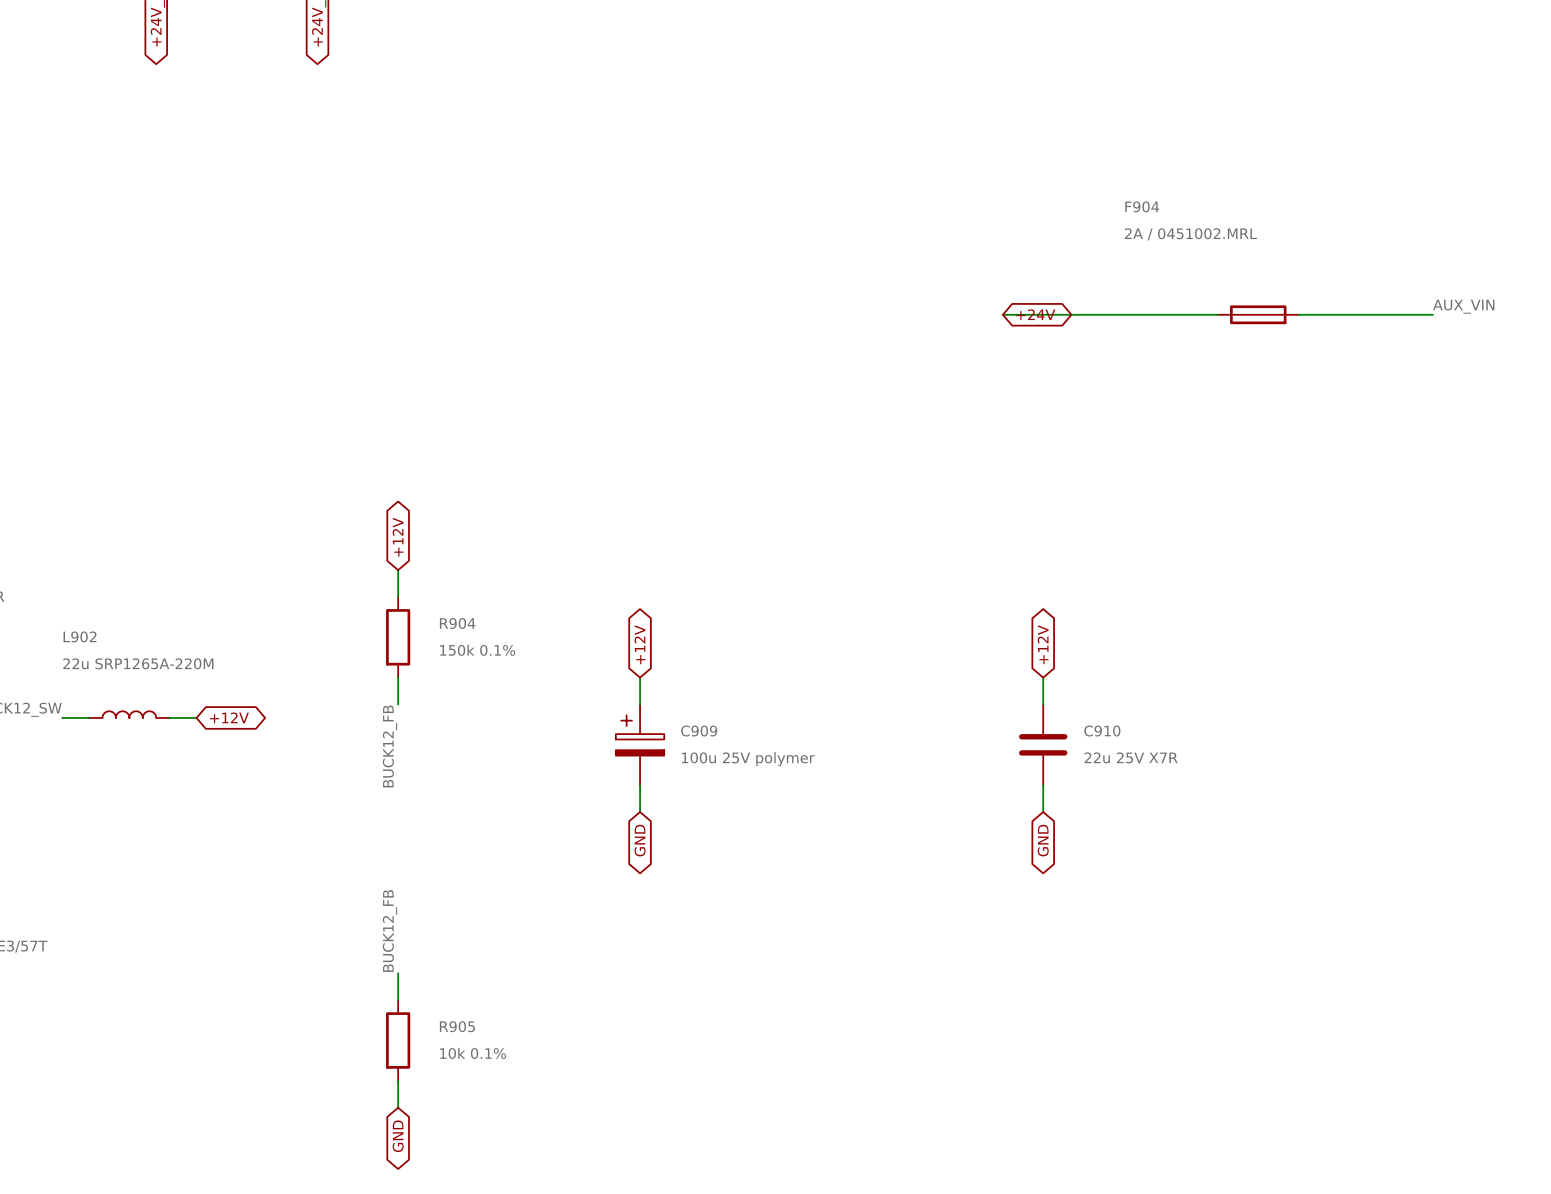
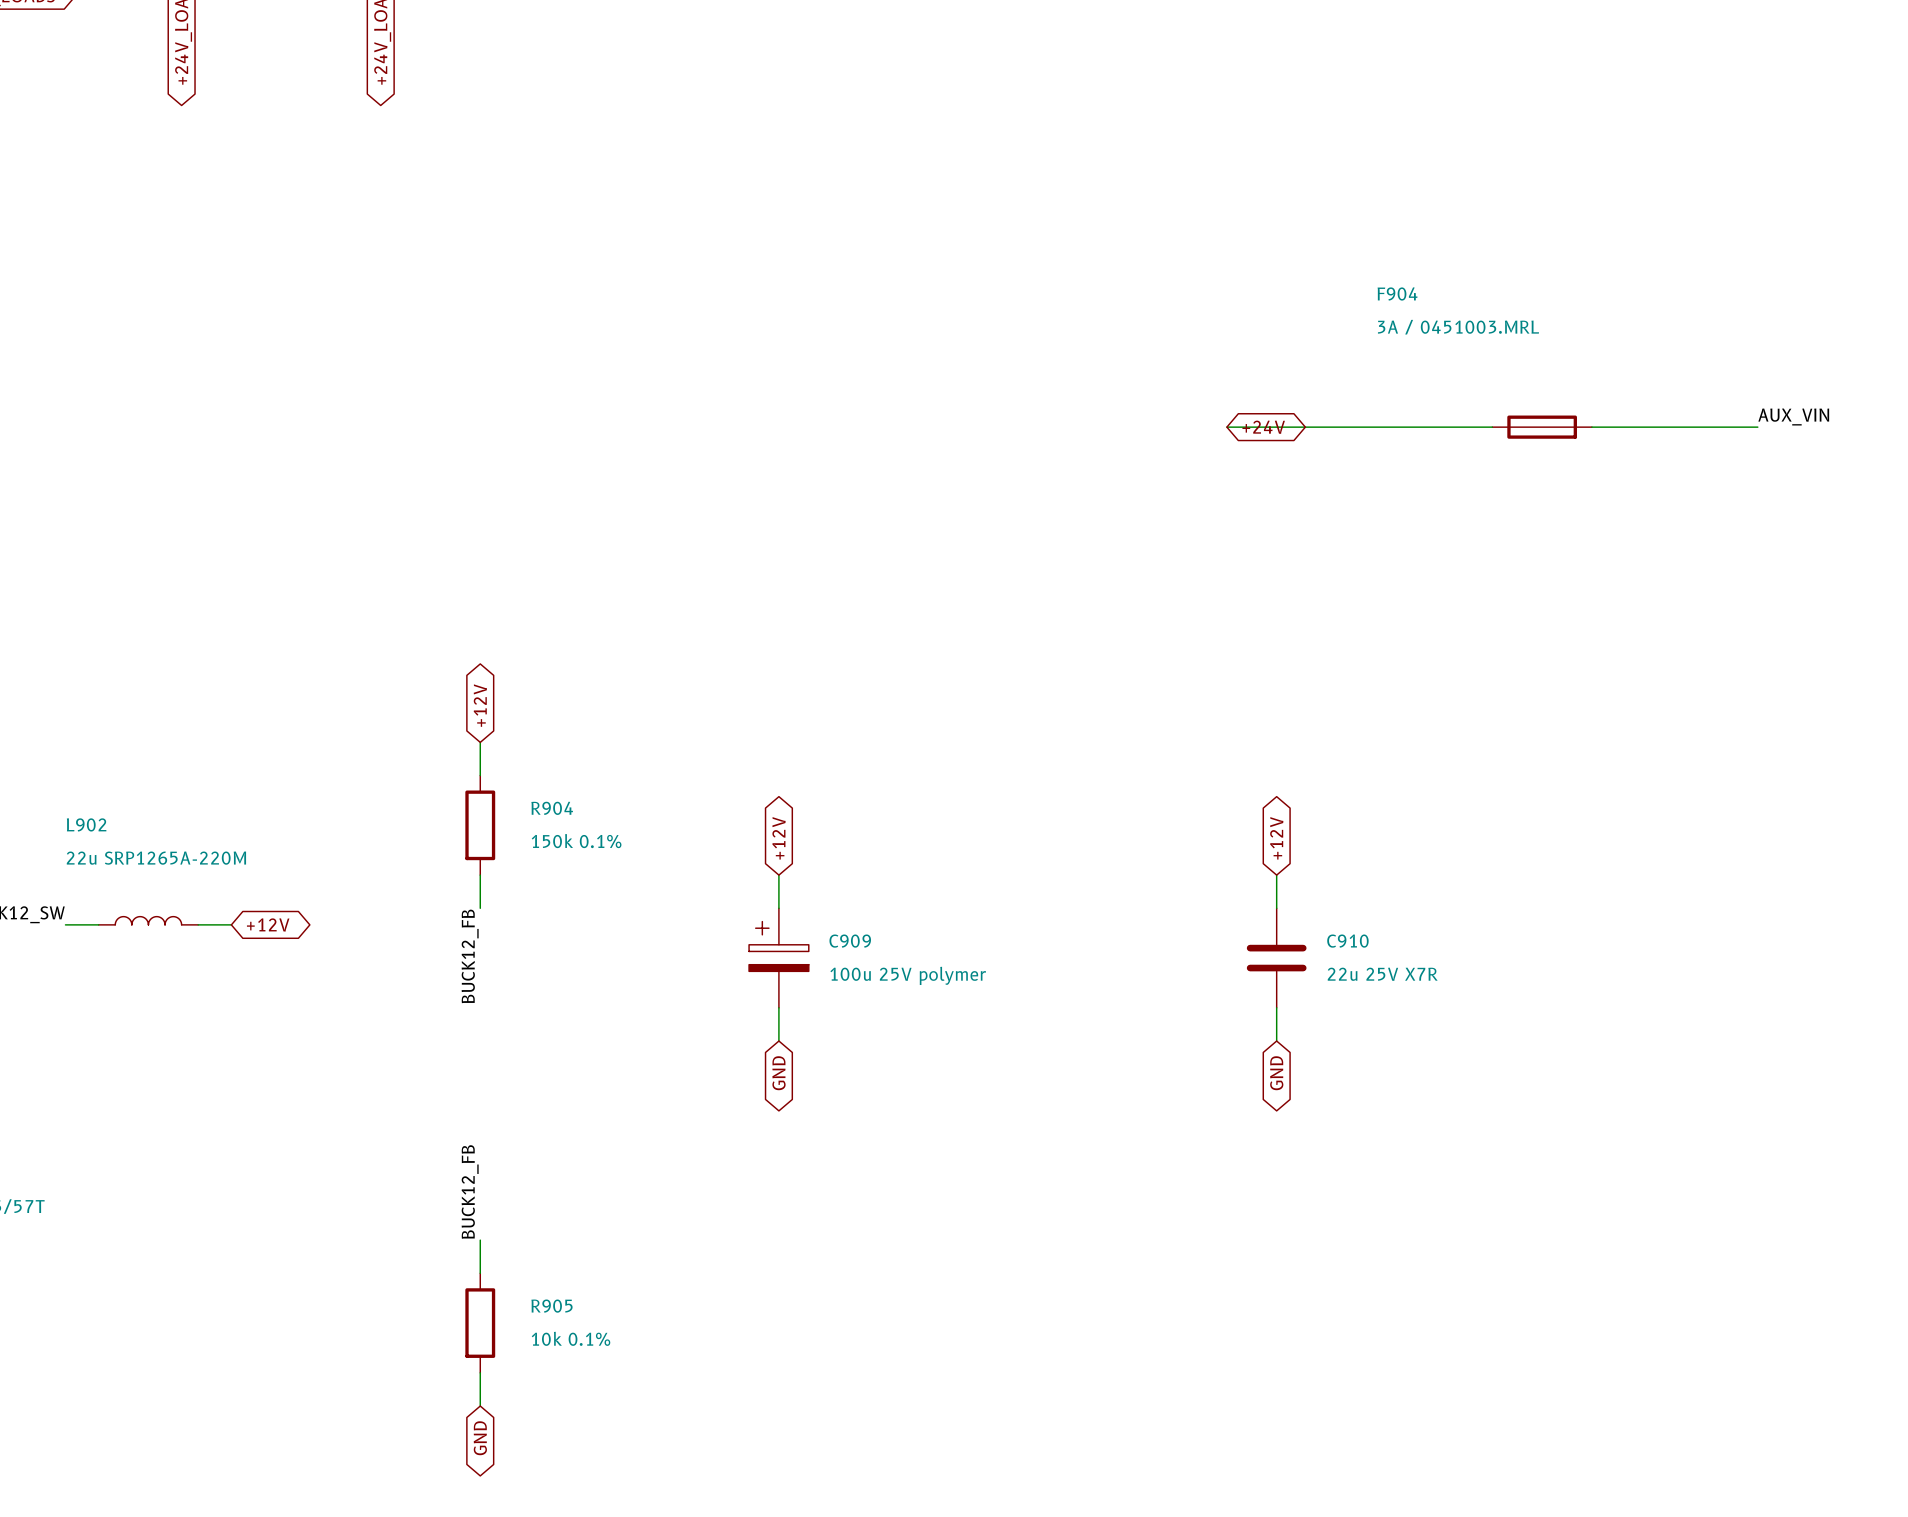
F904 value: 2A / 0451002.MRL (1190, 234) -> 3A / 0451003.MRL (1458, 327)

